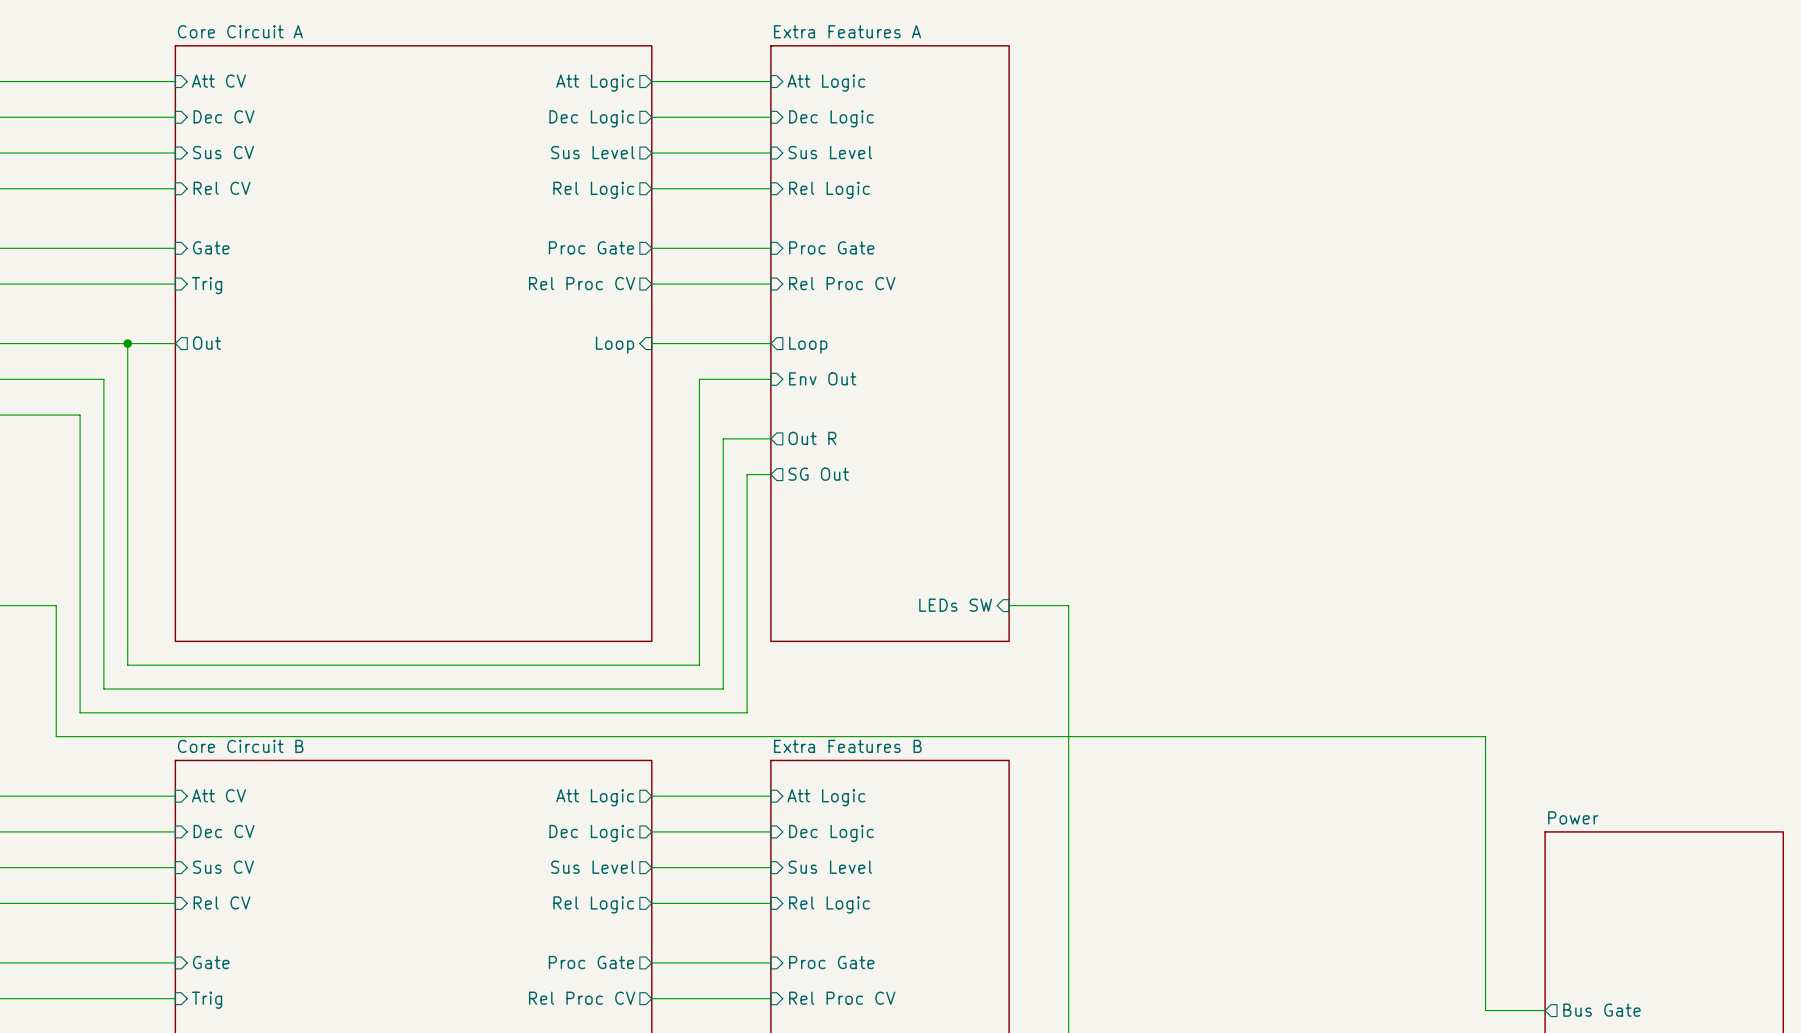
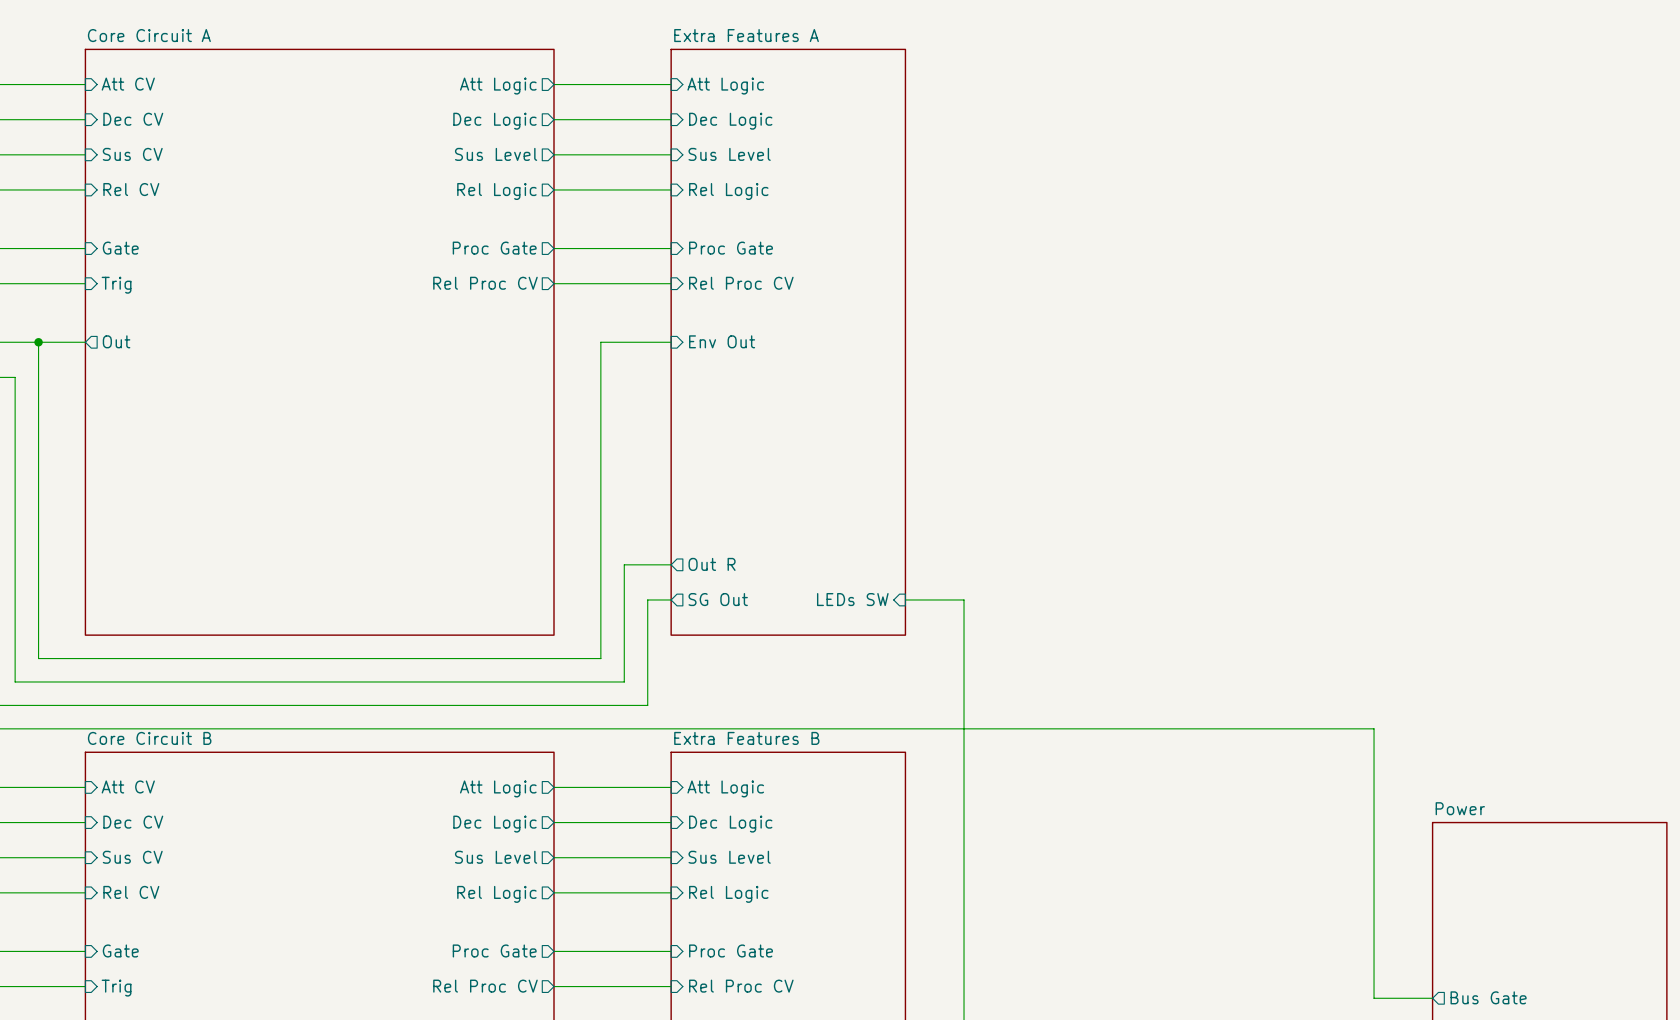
wire: (651, 343) (699, 343) -> (600, 377) (600, 342)
sheet pin: Loop (615, 345) -> none
sheet pin shape: output (808, 345) -> input (722, 341)
sheet pin: Loop (808, 345) -> Env Out (722, 341)
sheet pin: Env Out (822, 378) -> none
wire: (699, 379) (770, 379) -> none
wire: (770, 438) (723, 438) (723, 569) -> (671, 564) (624, 564)
sheet pin position: Out R (812, 438) -> Out R (712, 564)
wire: (770, 474) (747, 474) (747, 605) -> (671, 599) (647, 599)
sheet pin position: SG Out (818, 474) -> SG Out (718, 599)

